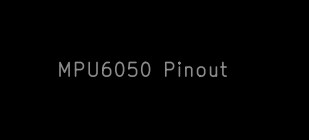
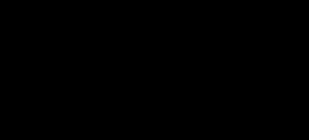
text: MPU6050 Pinout (143, 69) -> none

